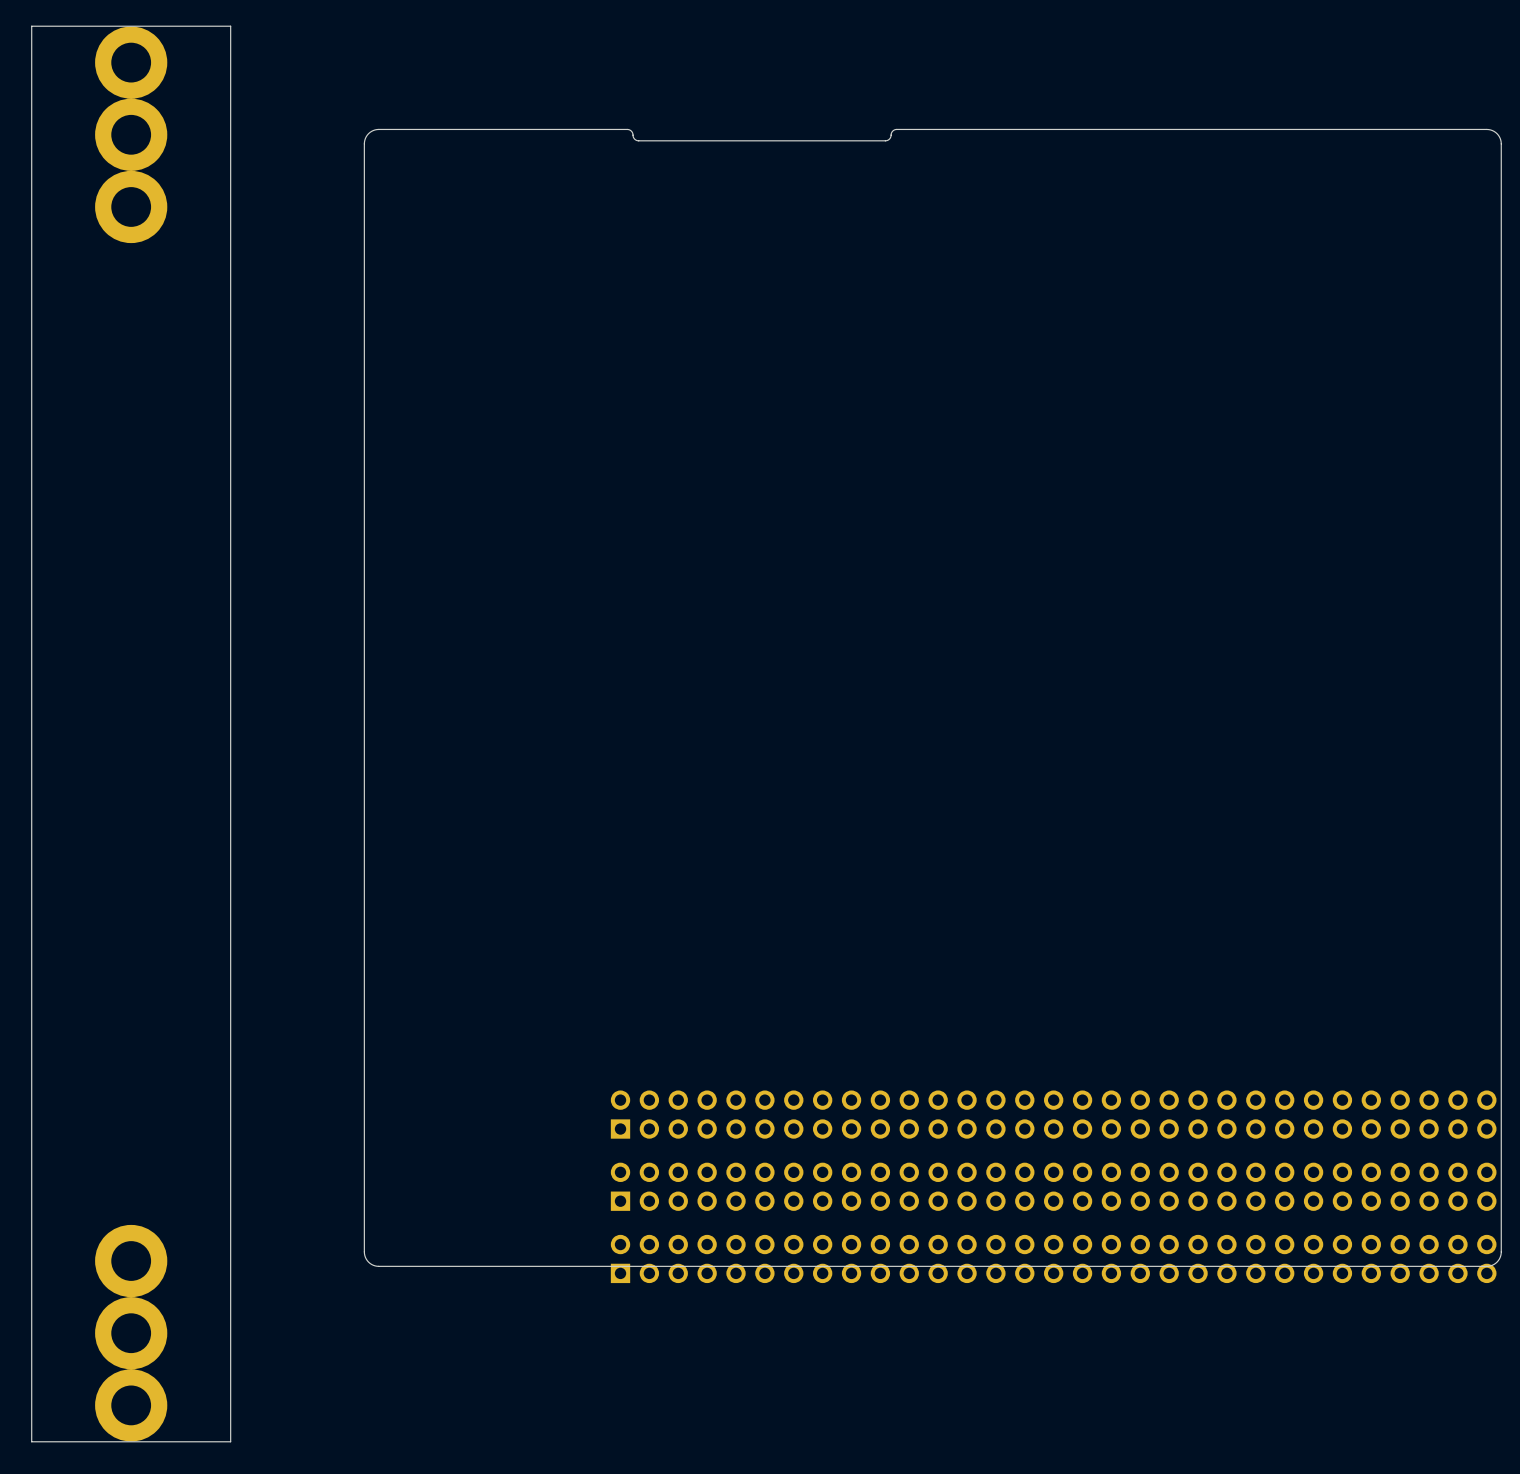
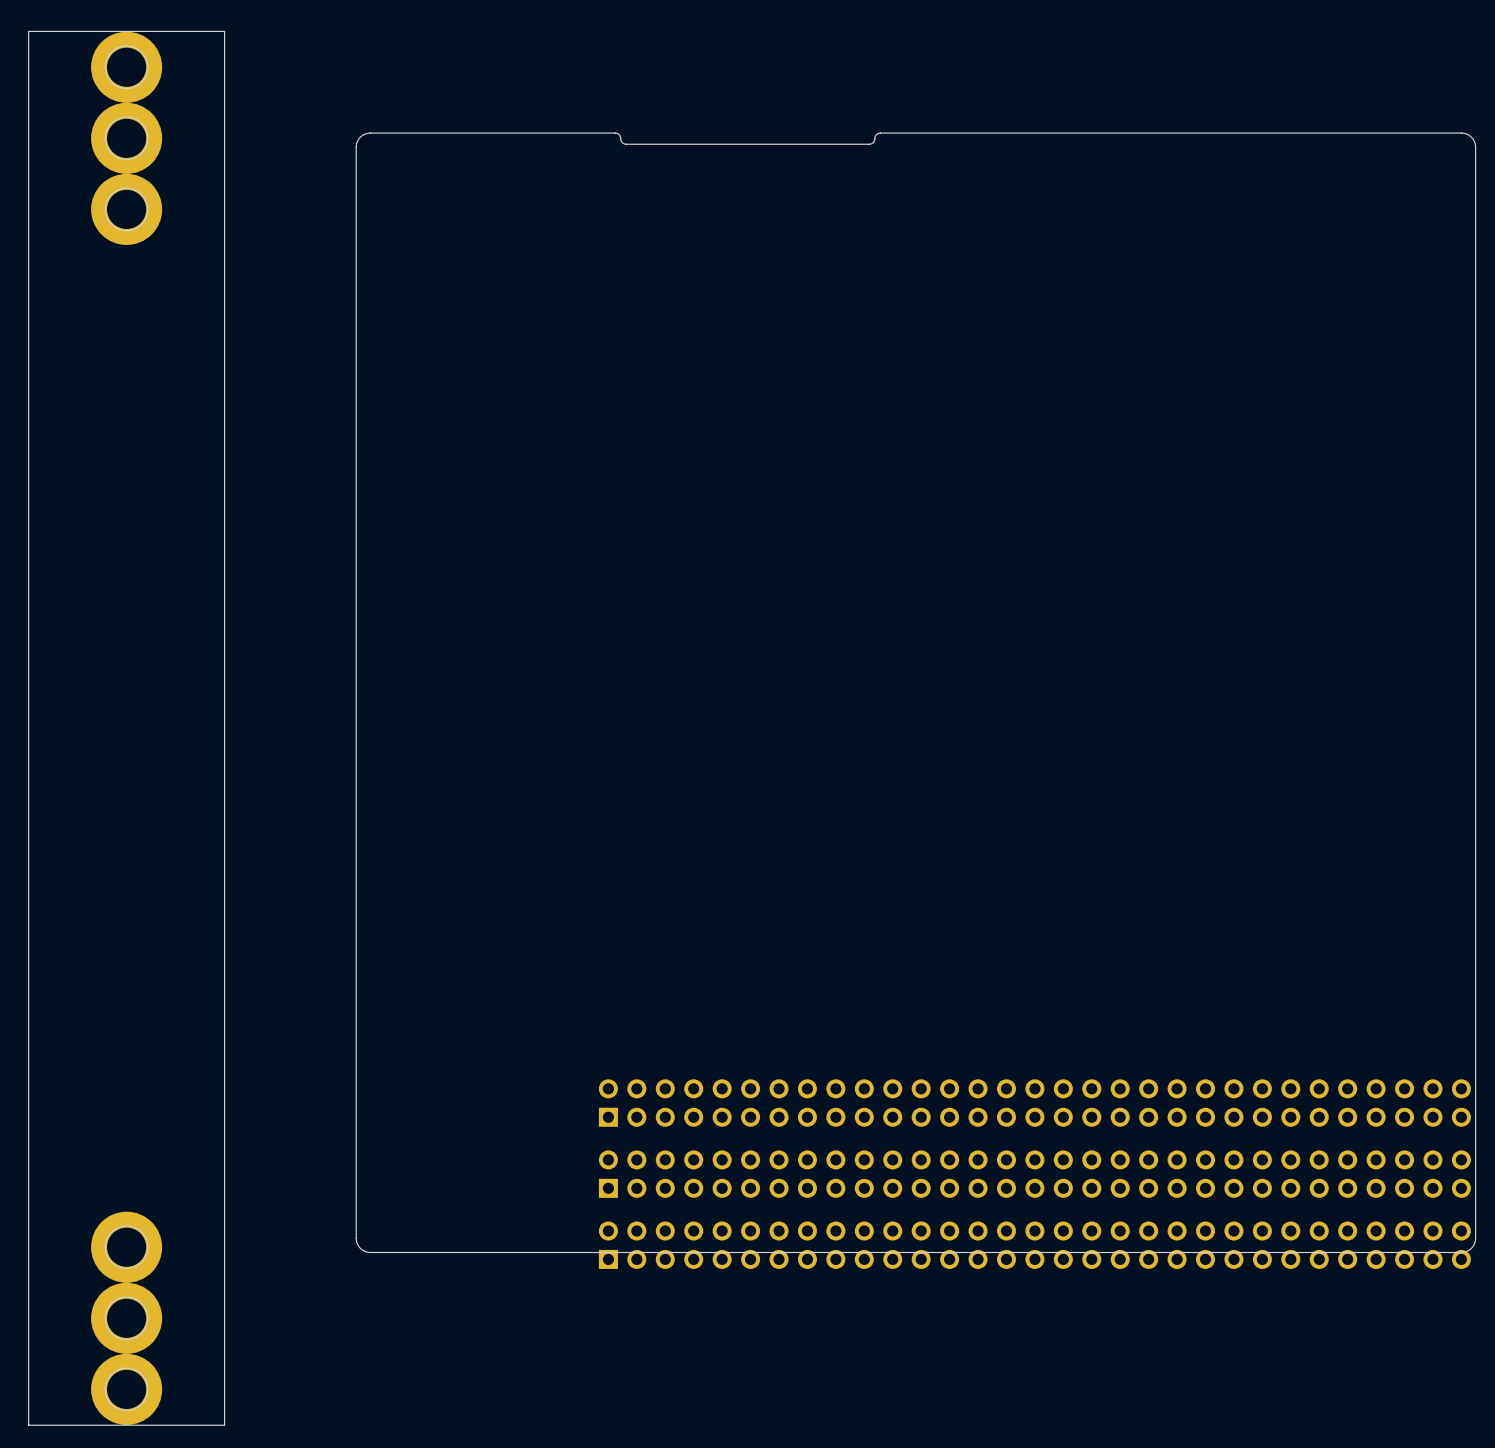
round board edge: none -> [104, 45, 149, 90]
round board edge: none -> [104, 116, 149, 161]
round board edge: none -> [104, 187, 149, 232]
round board edge: none -> [104, 1225, 149, 1270]
round board edge: none -> [104, 1296, 149, 1341]
round board edge: none -> [104, 1367, 149, 1412]

